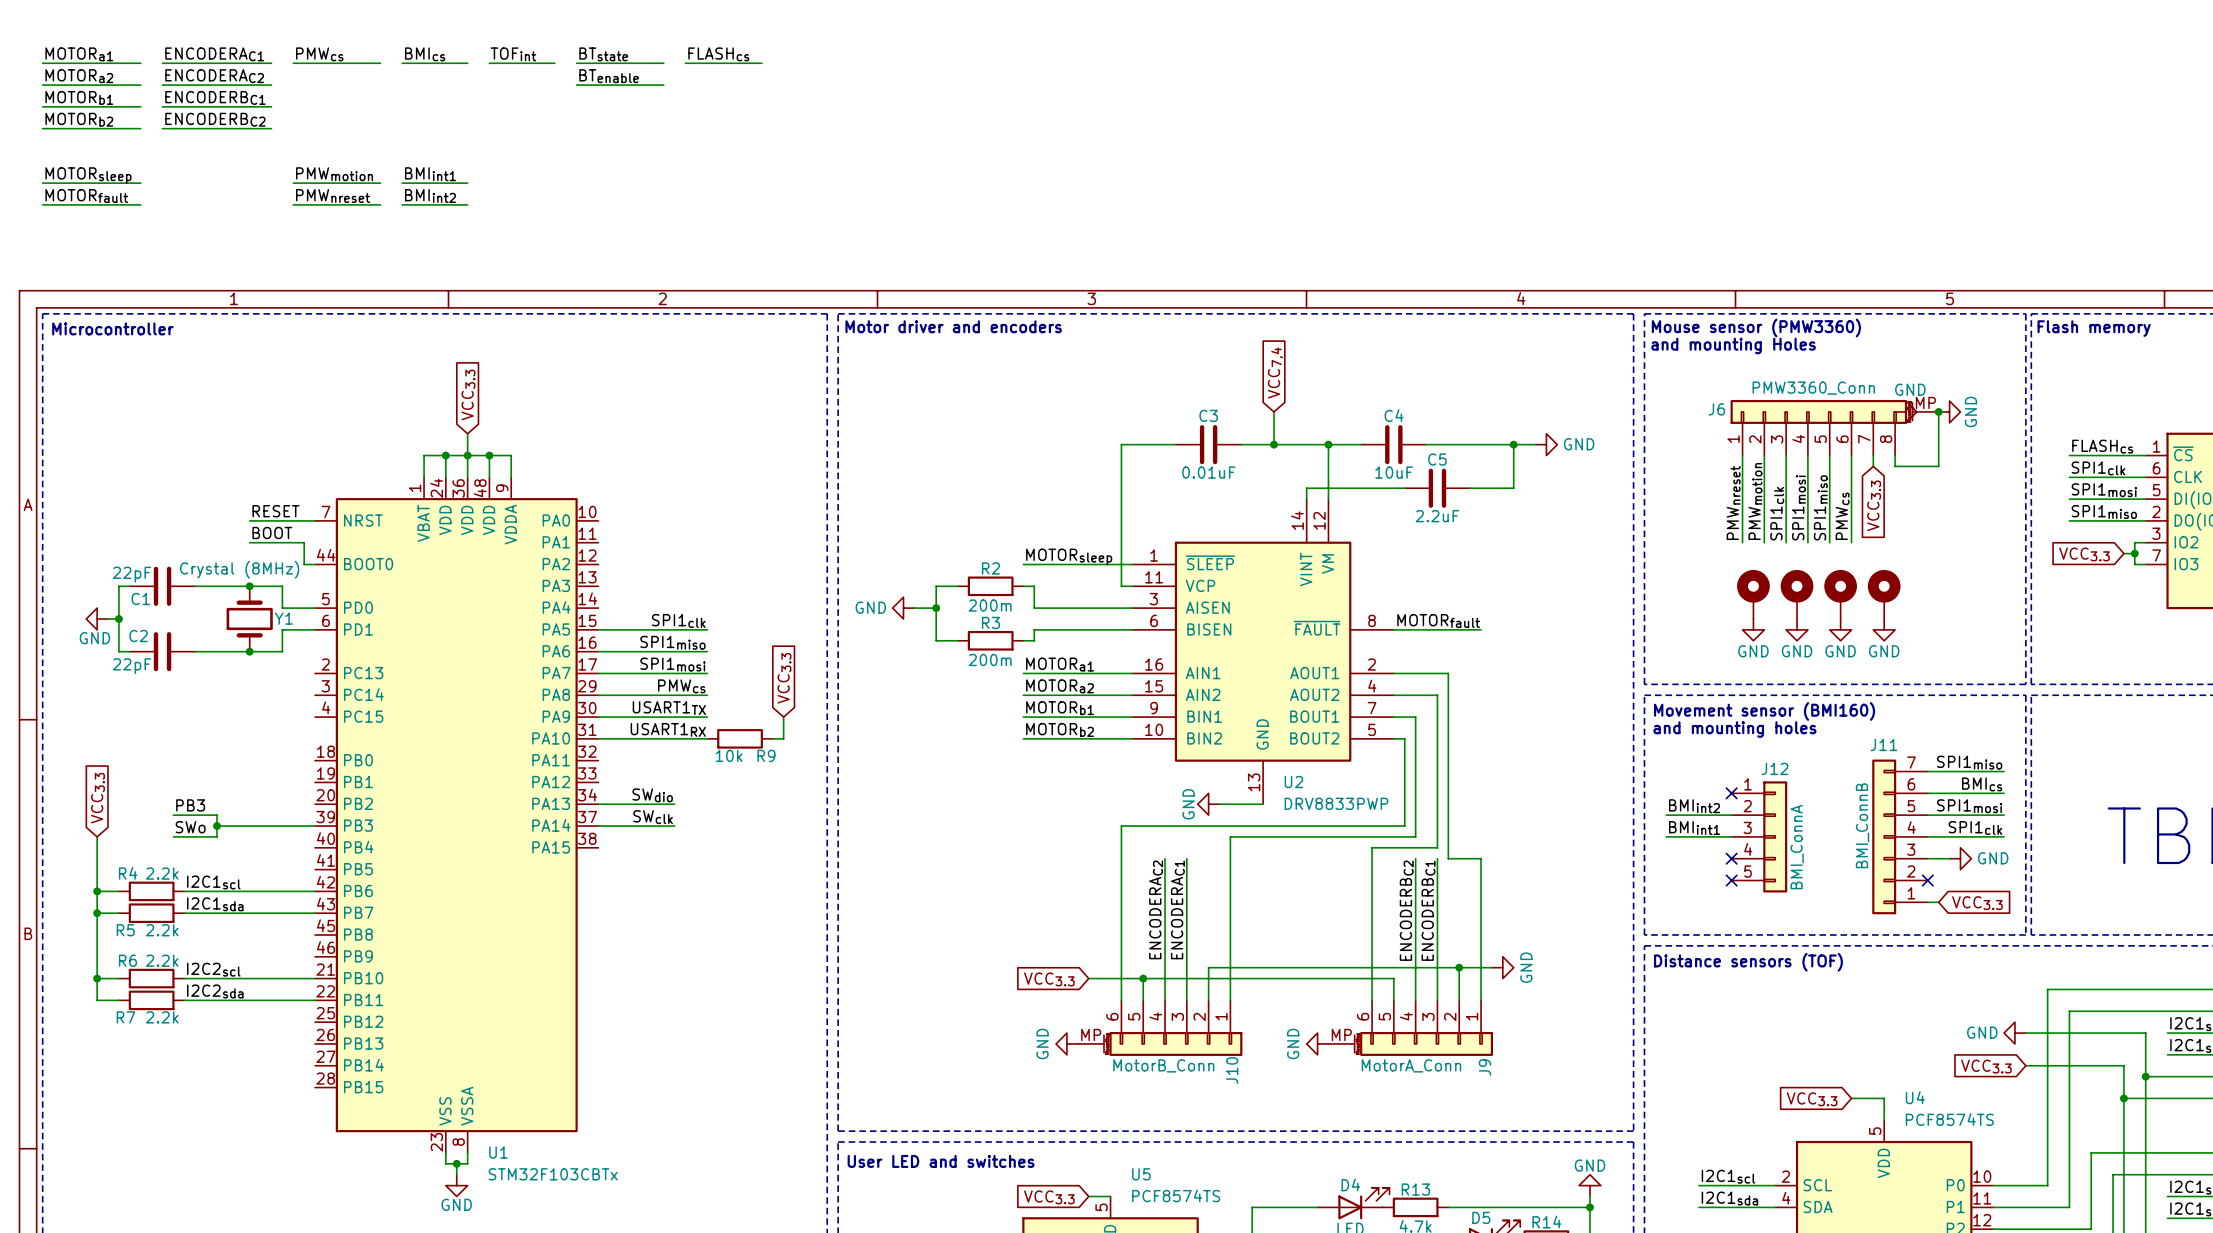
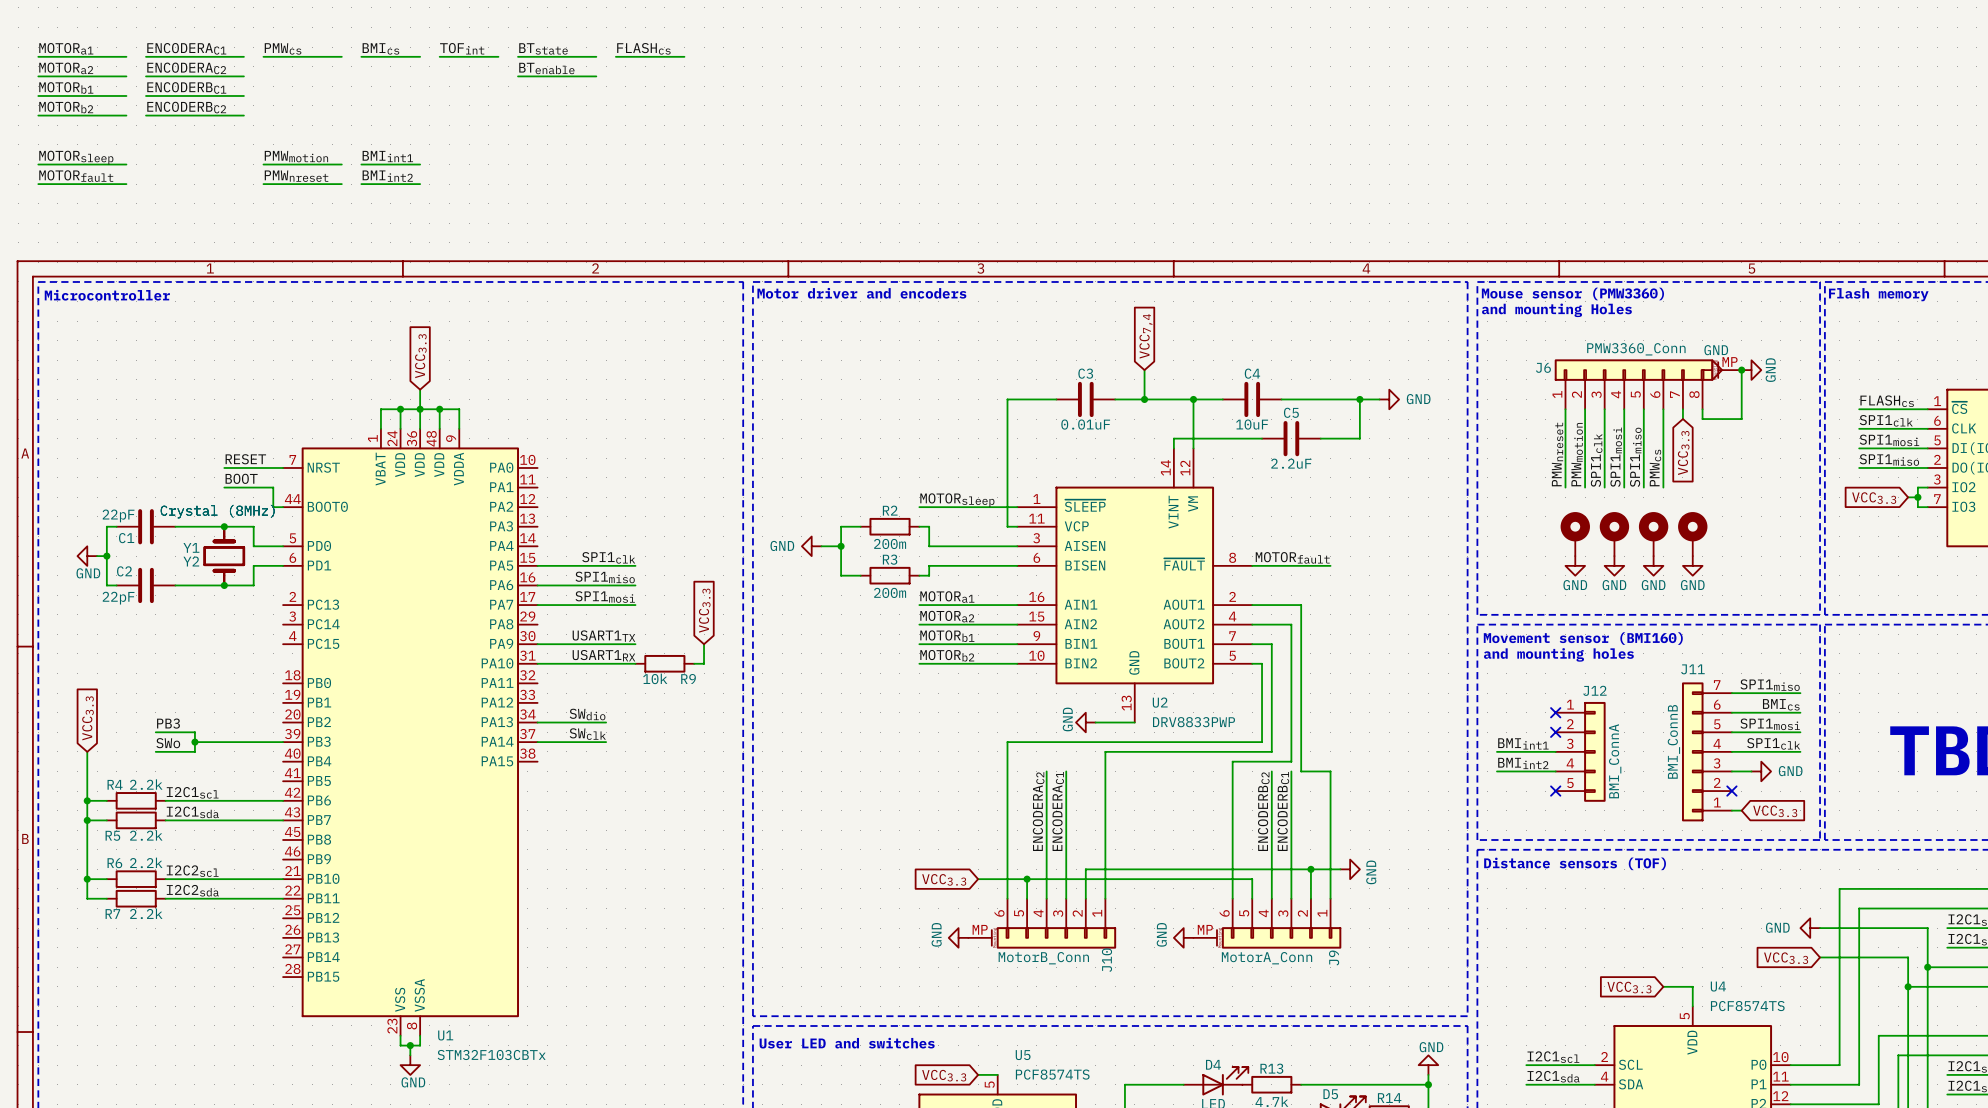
Y2: none -> Crystal (8MHz) (224, 556)
Y1 name position: Y1 (283, 618) -> Y1 (191, 547)
label: PMWcs (681, 686) -> none
wire: (598, 695) (707, 695) -> none
label position: BMIint2 (1694, 806) -> BMIint2 (1523, 763)
wire: (1666, 815) (1731, 815) -> (1496, 771) (1555, 771)
no-connect mark position: (1731, 858) -> (1555, 732)

